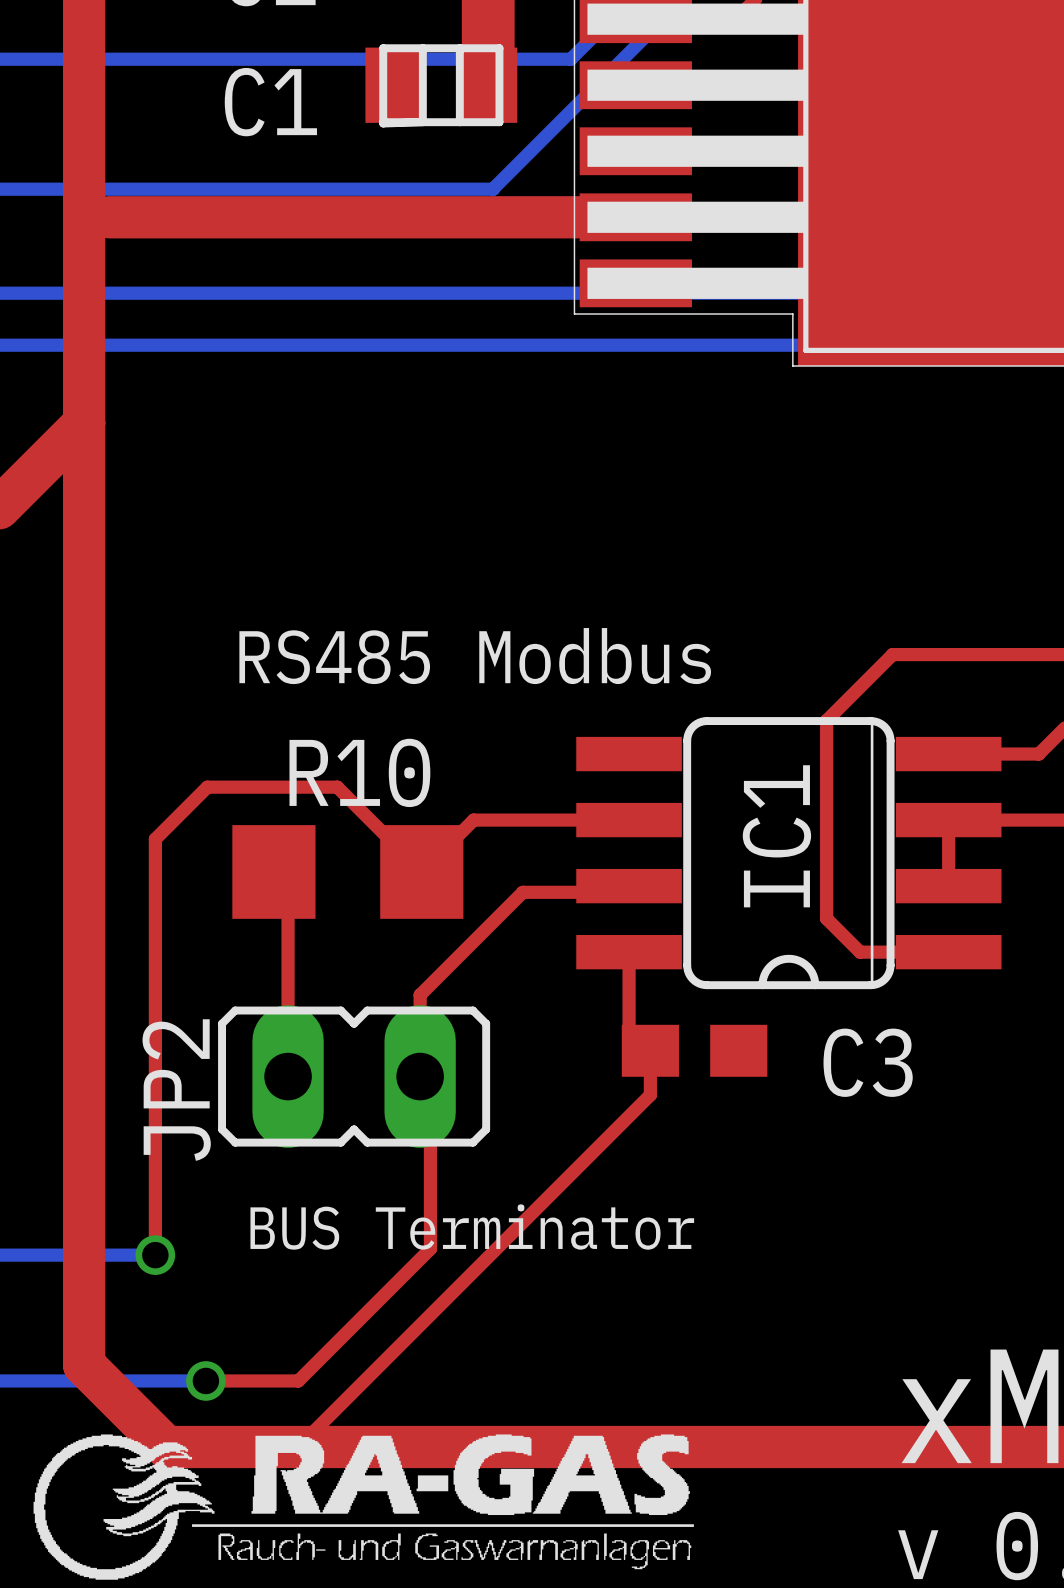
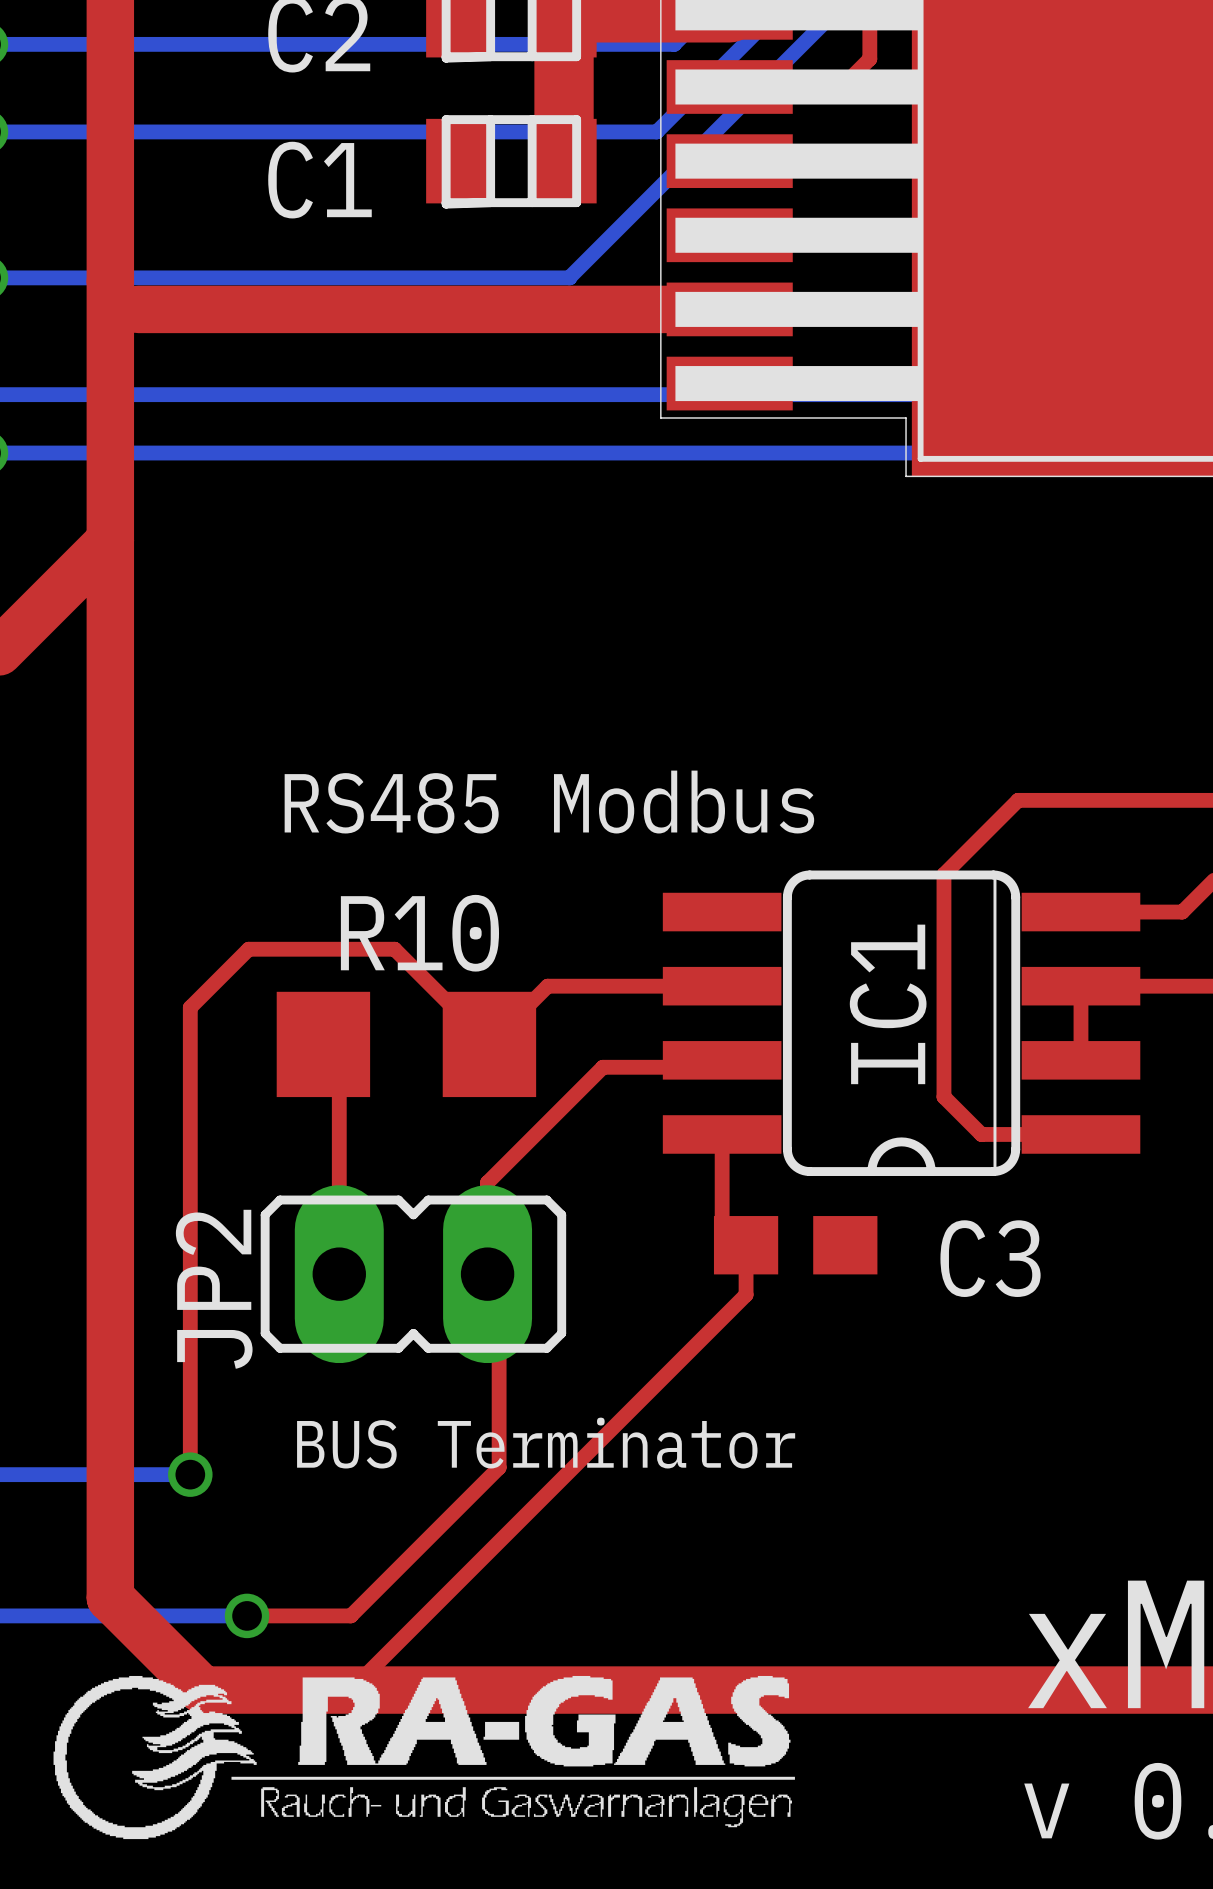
JP2 footprint: [218, 1005, 491, 1148] -> [260, 1185, 567, 1364]

